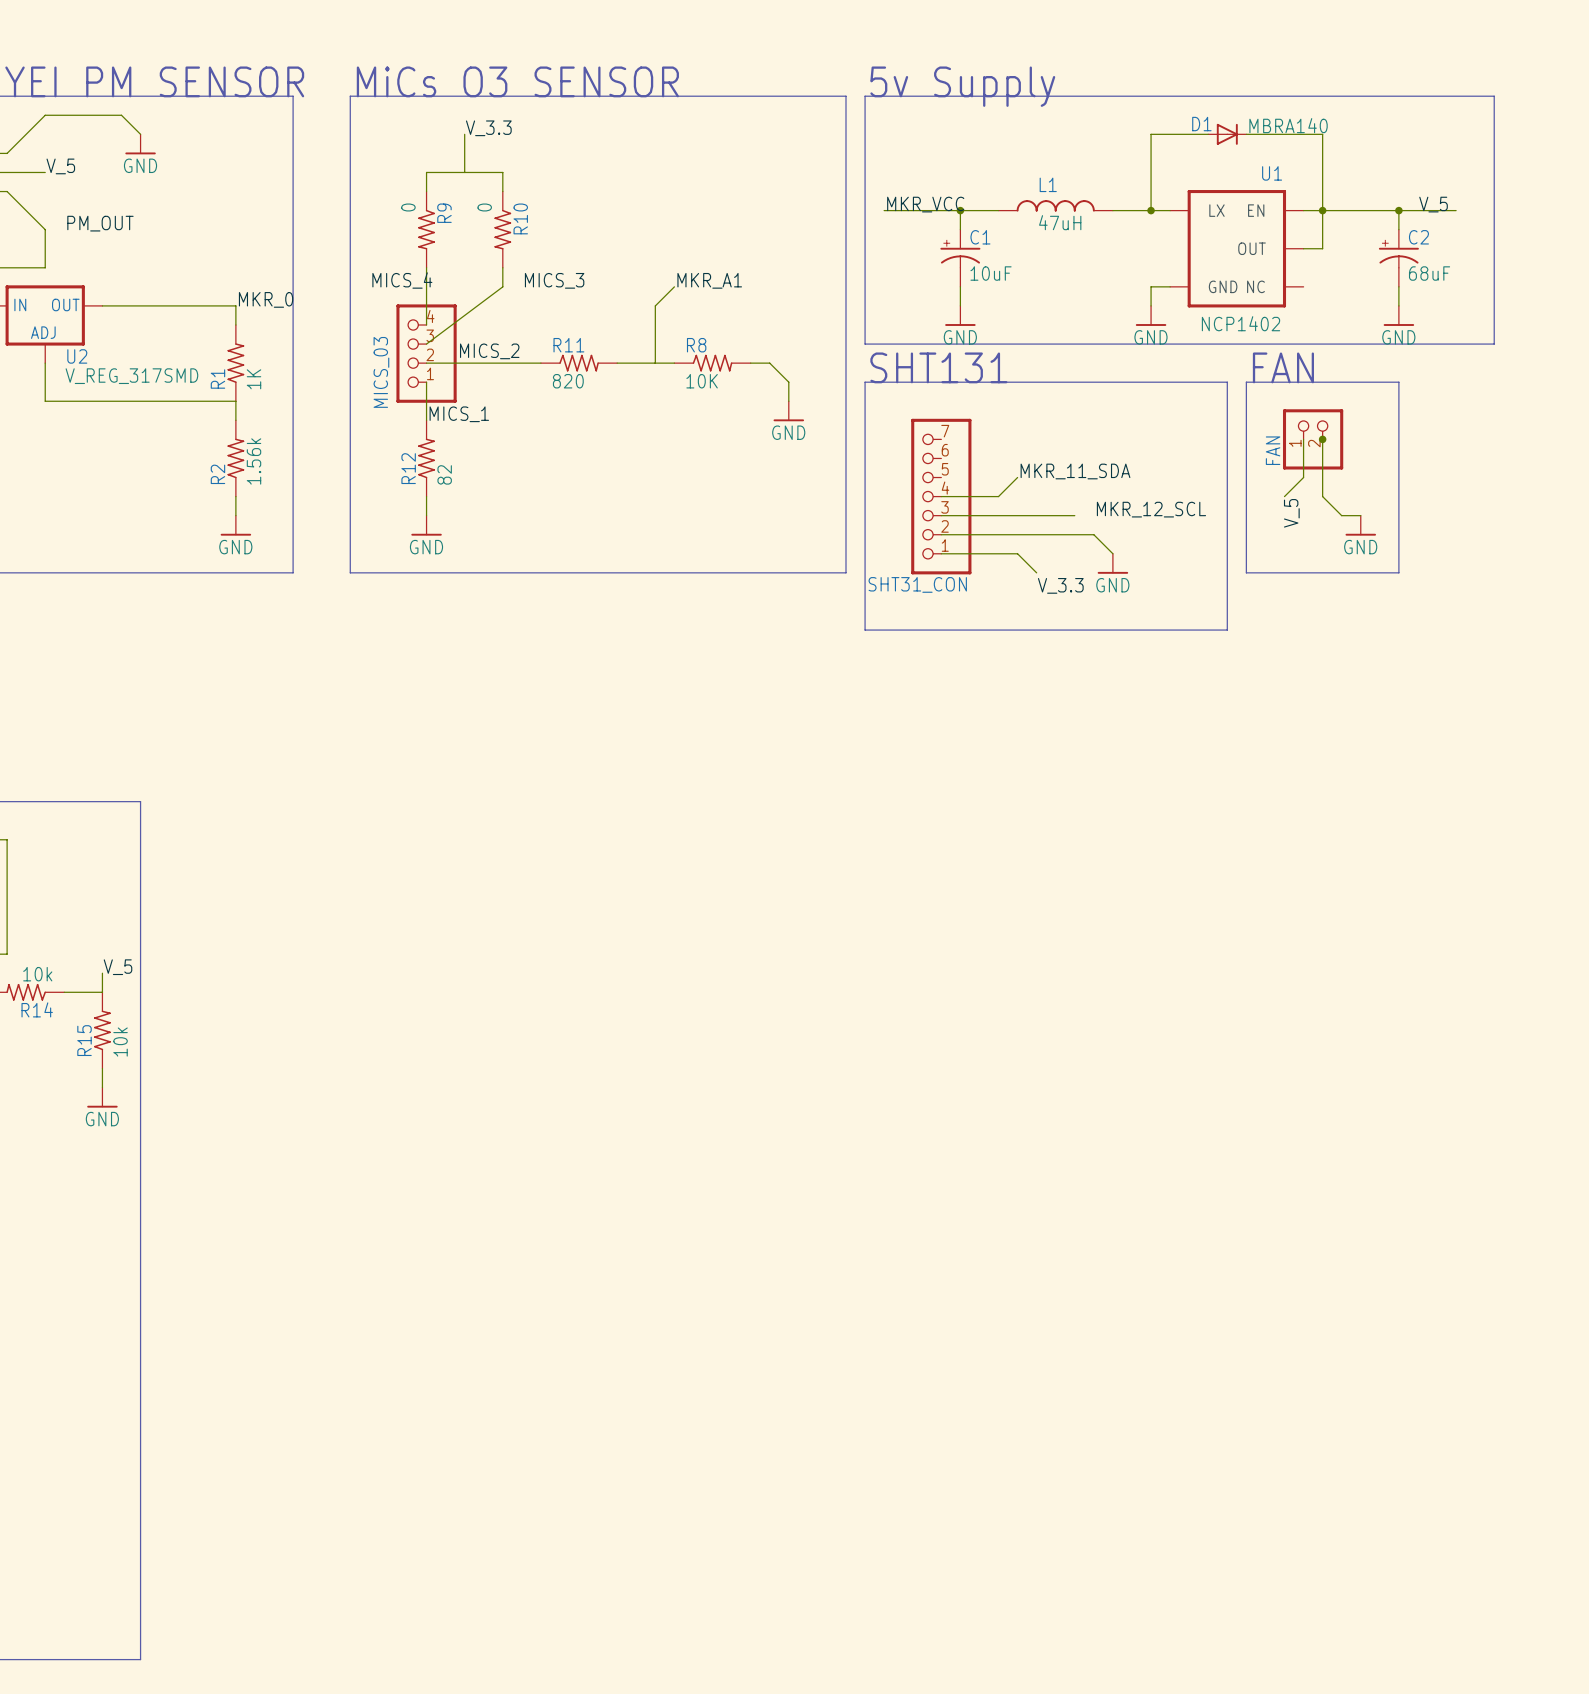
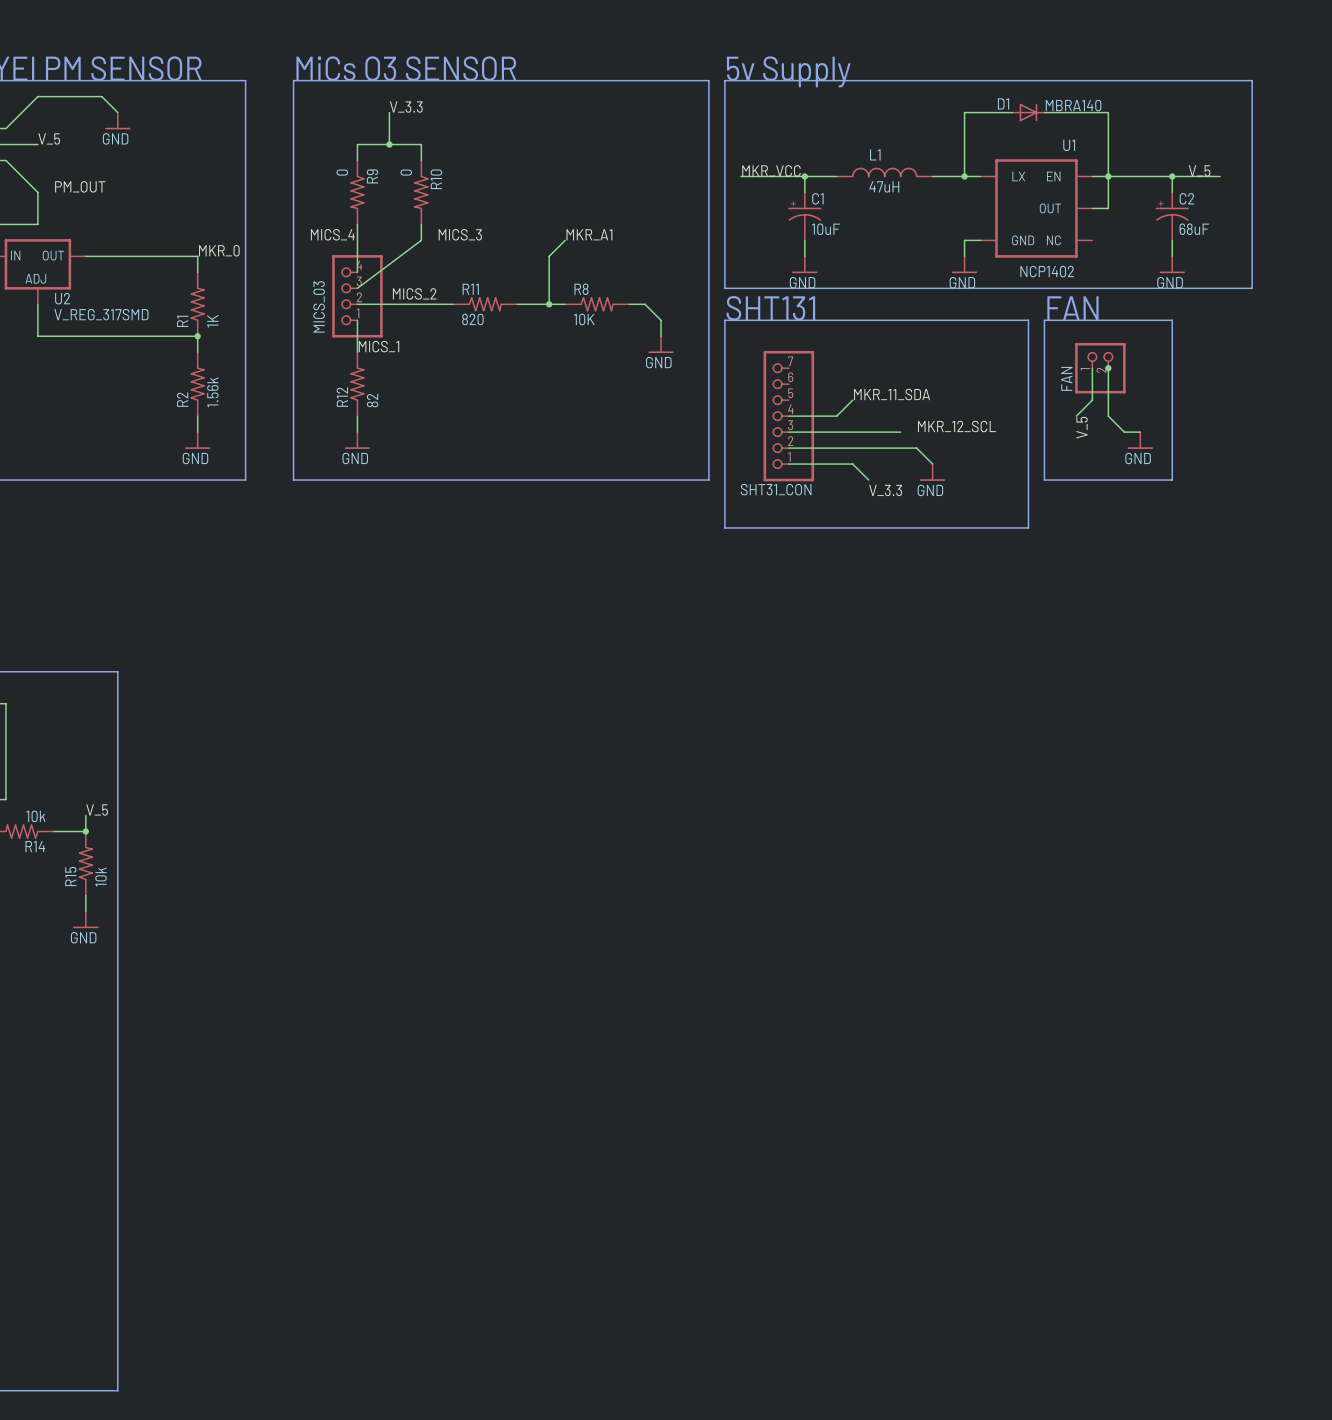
junction: none -> (389, 144)
junction: none -> (549, 304)
junction: none -> (197, 336)
junction: none -> (85, 831)

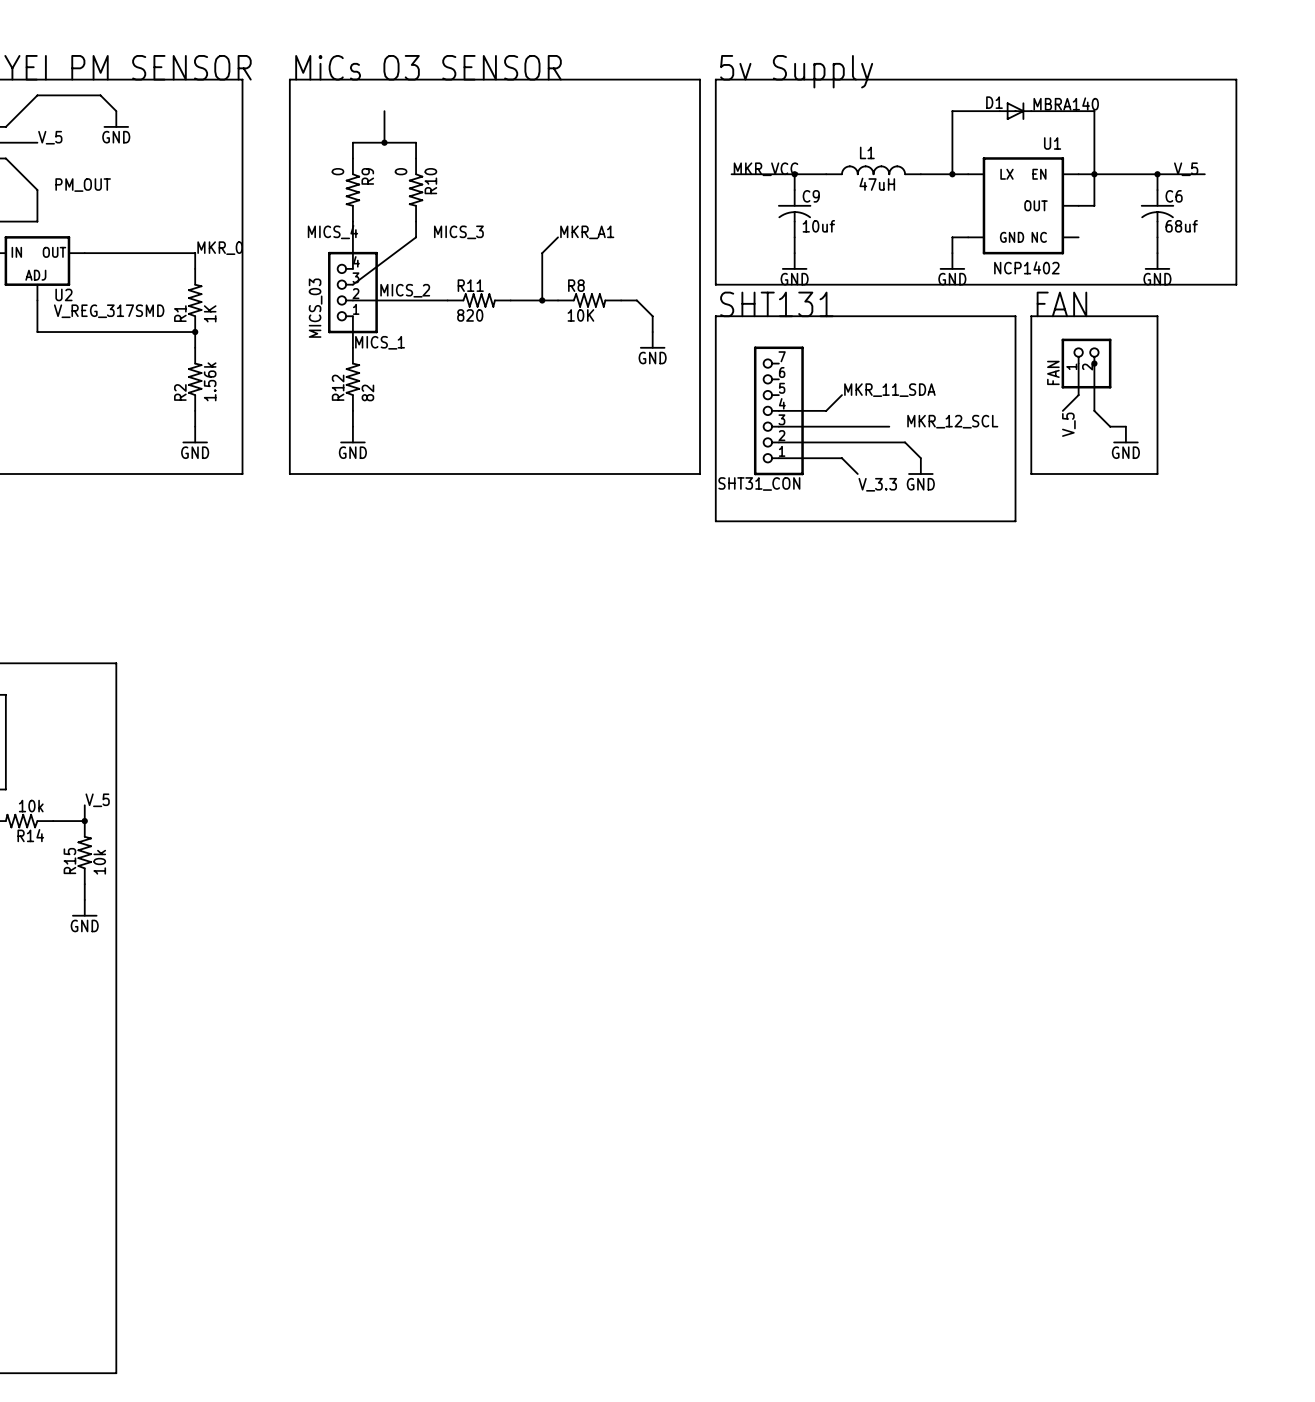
label: V_3.3 (406, 107) -> none
C1: 10uF (804, 216) -> none
C9: none -> 10uf (794, 213)
C2: 68uF (1172, 216) -> none
C6: none -> 68uf (1157, 213)

